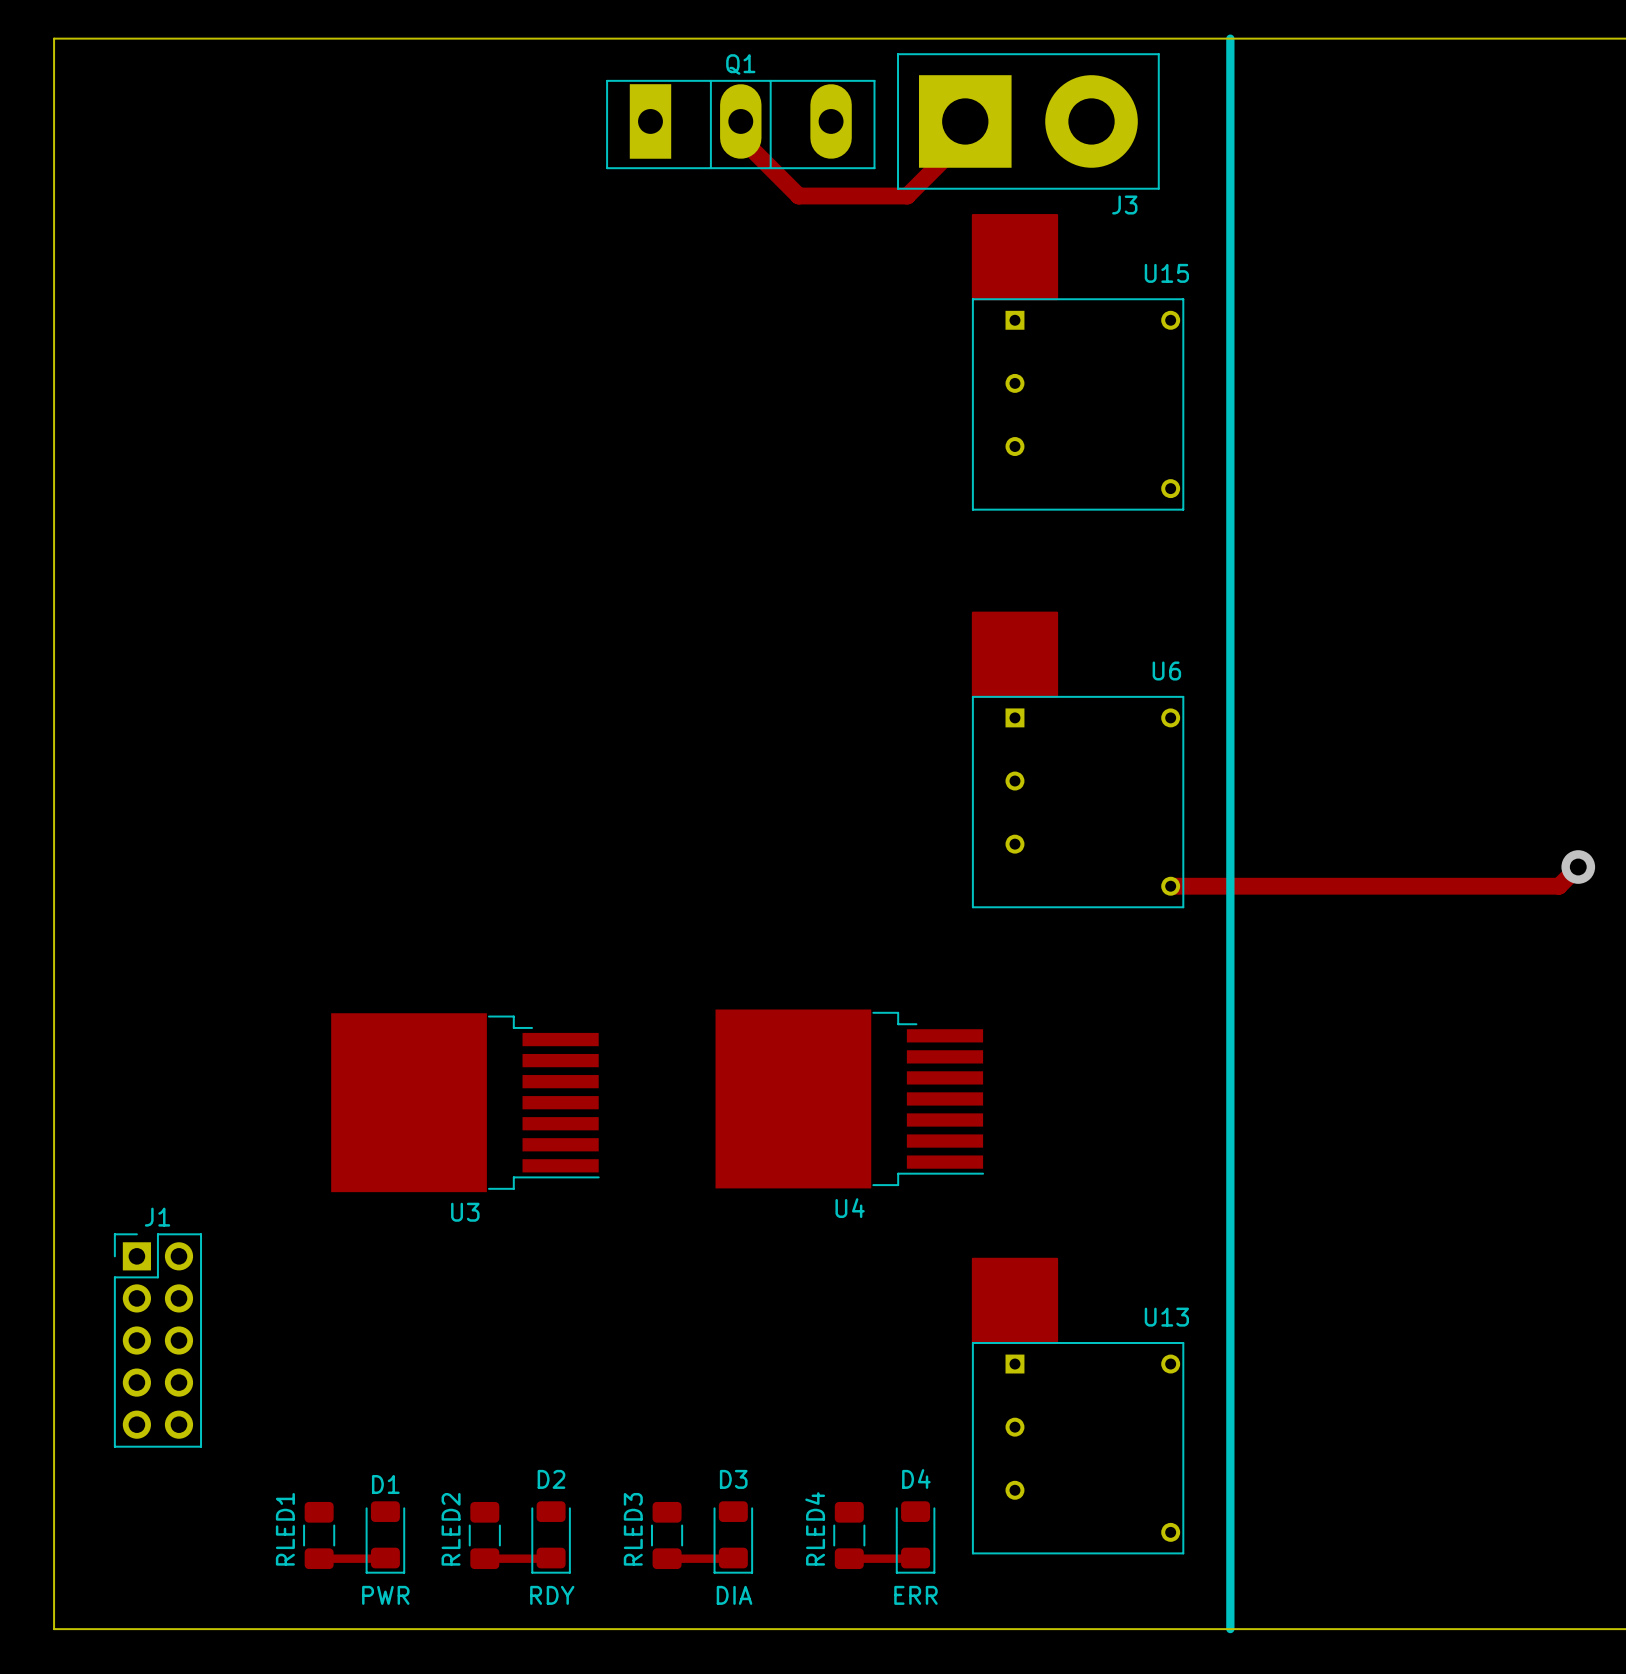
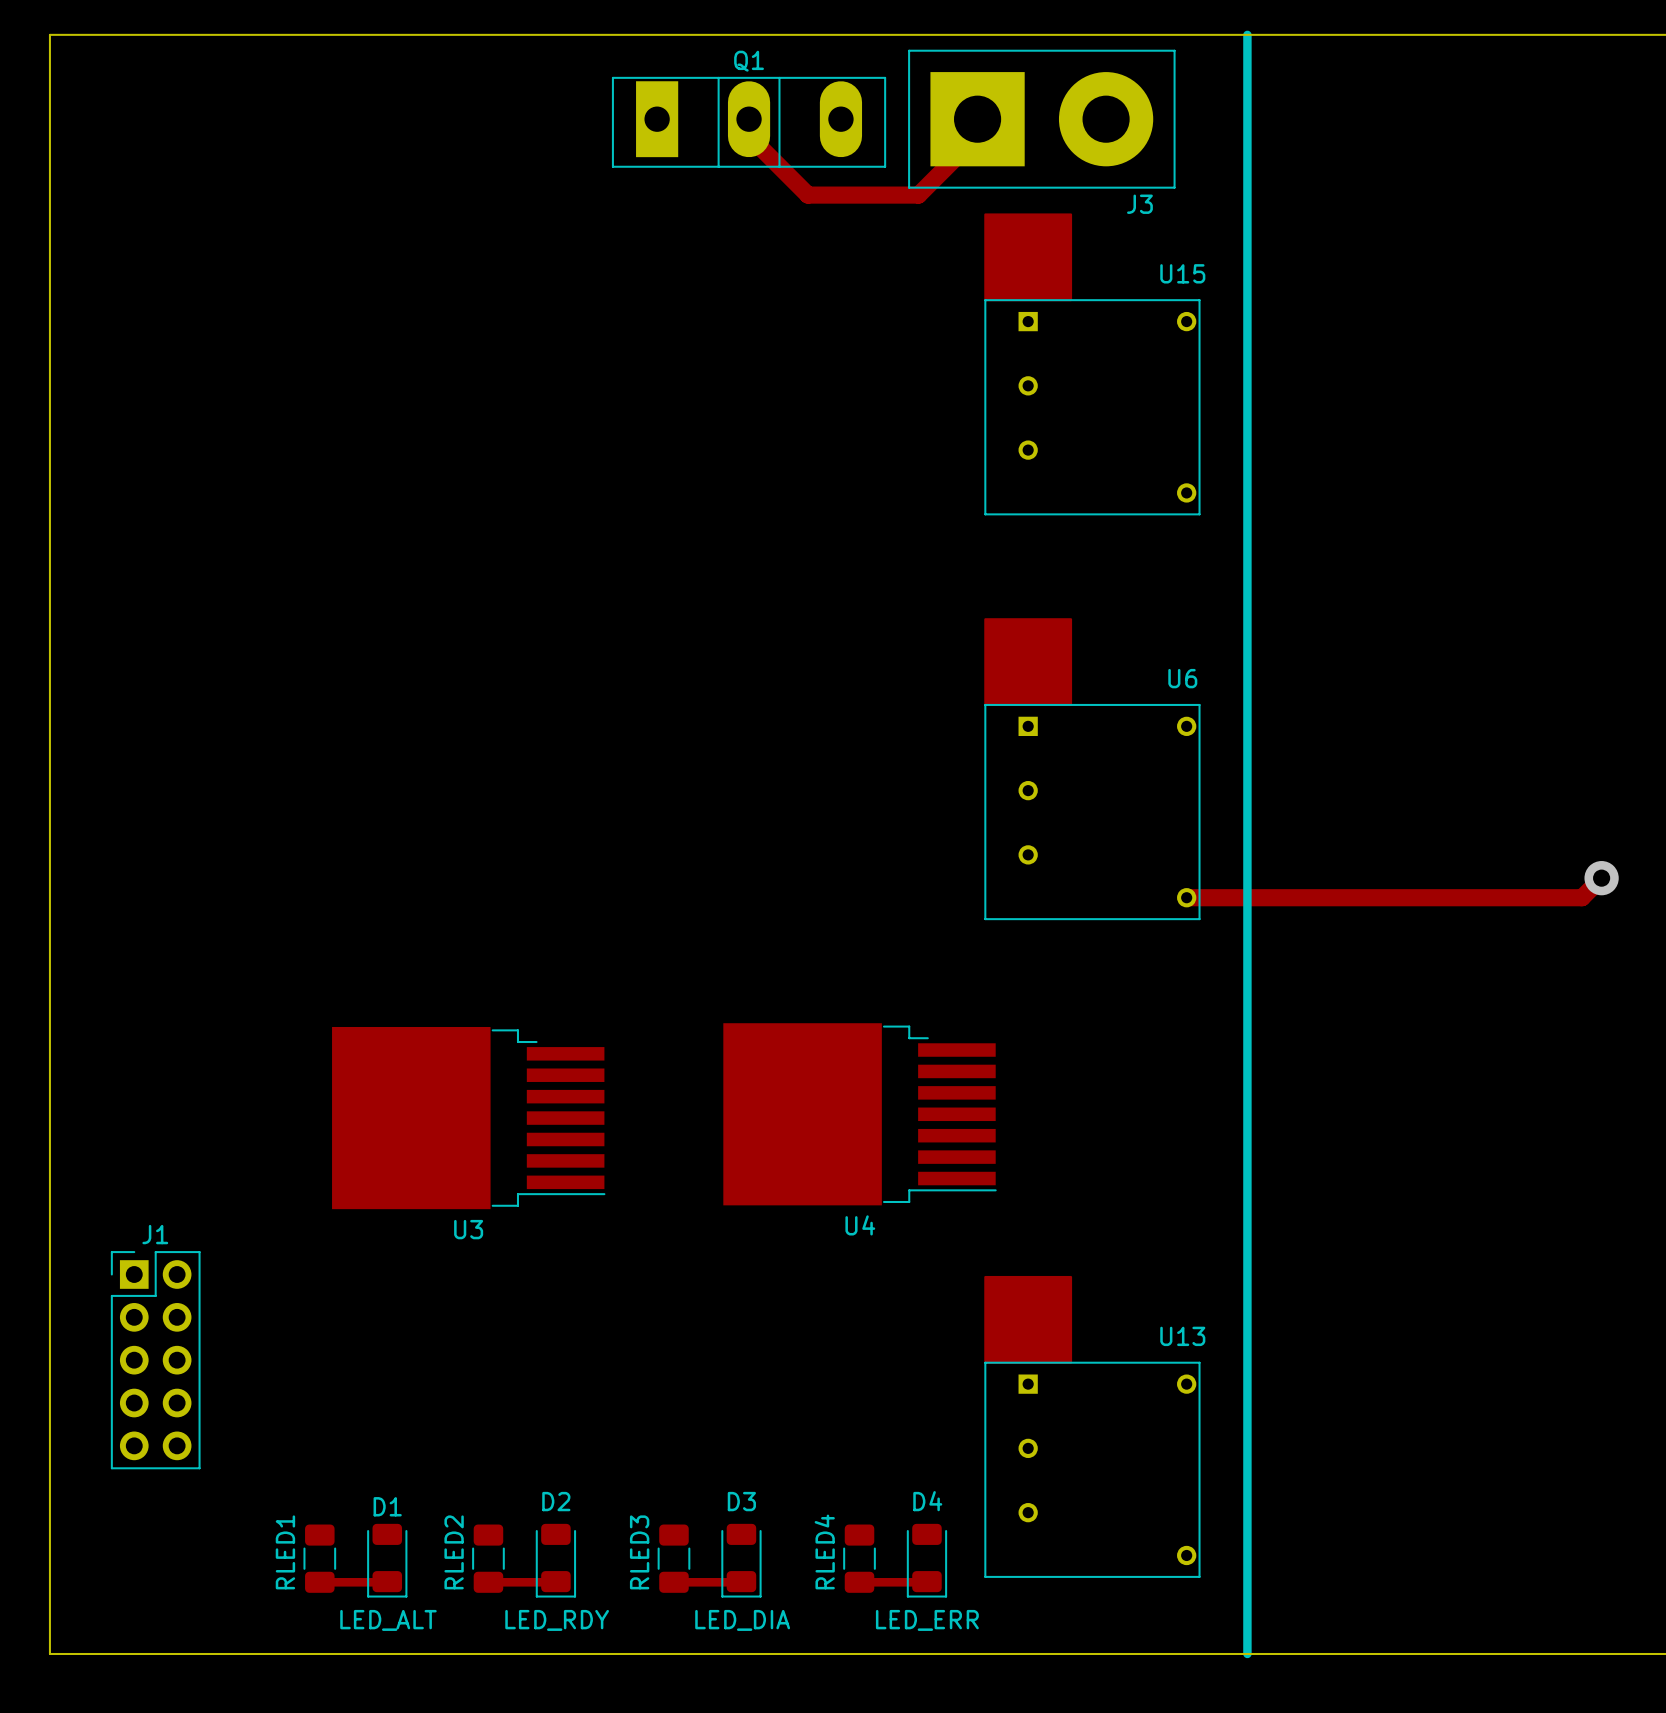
D1 value: PWR (385, 1595) -> LED_ALT (388, 1620)
D2 value: RDY (552, 1595) -> LED_RDY (557, 1620)
D3 value: DIA (734, 1595) -> LED_DIA (742, 1620)
D4 value: ERR (915, 1595) -> LED_ERR (927, 1620)

